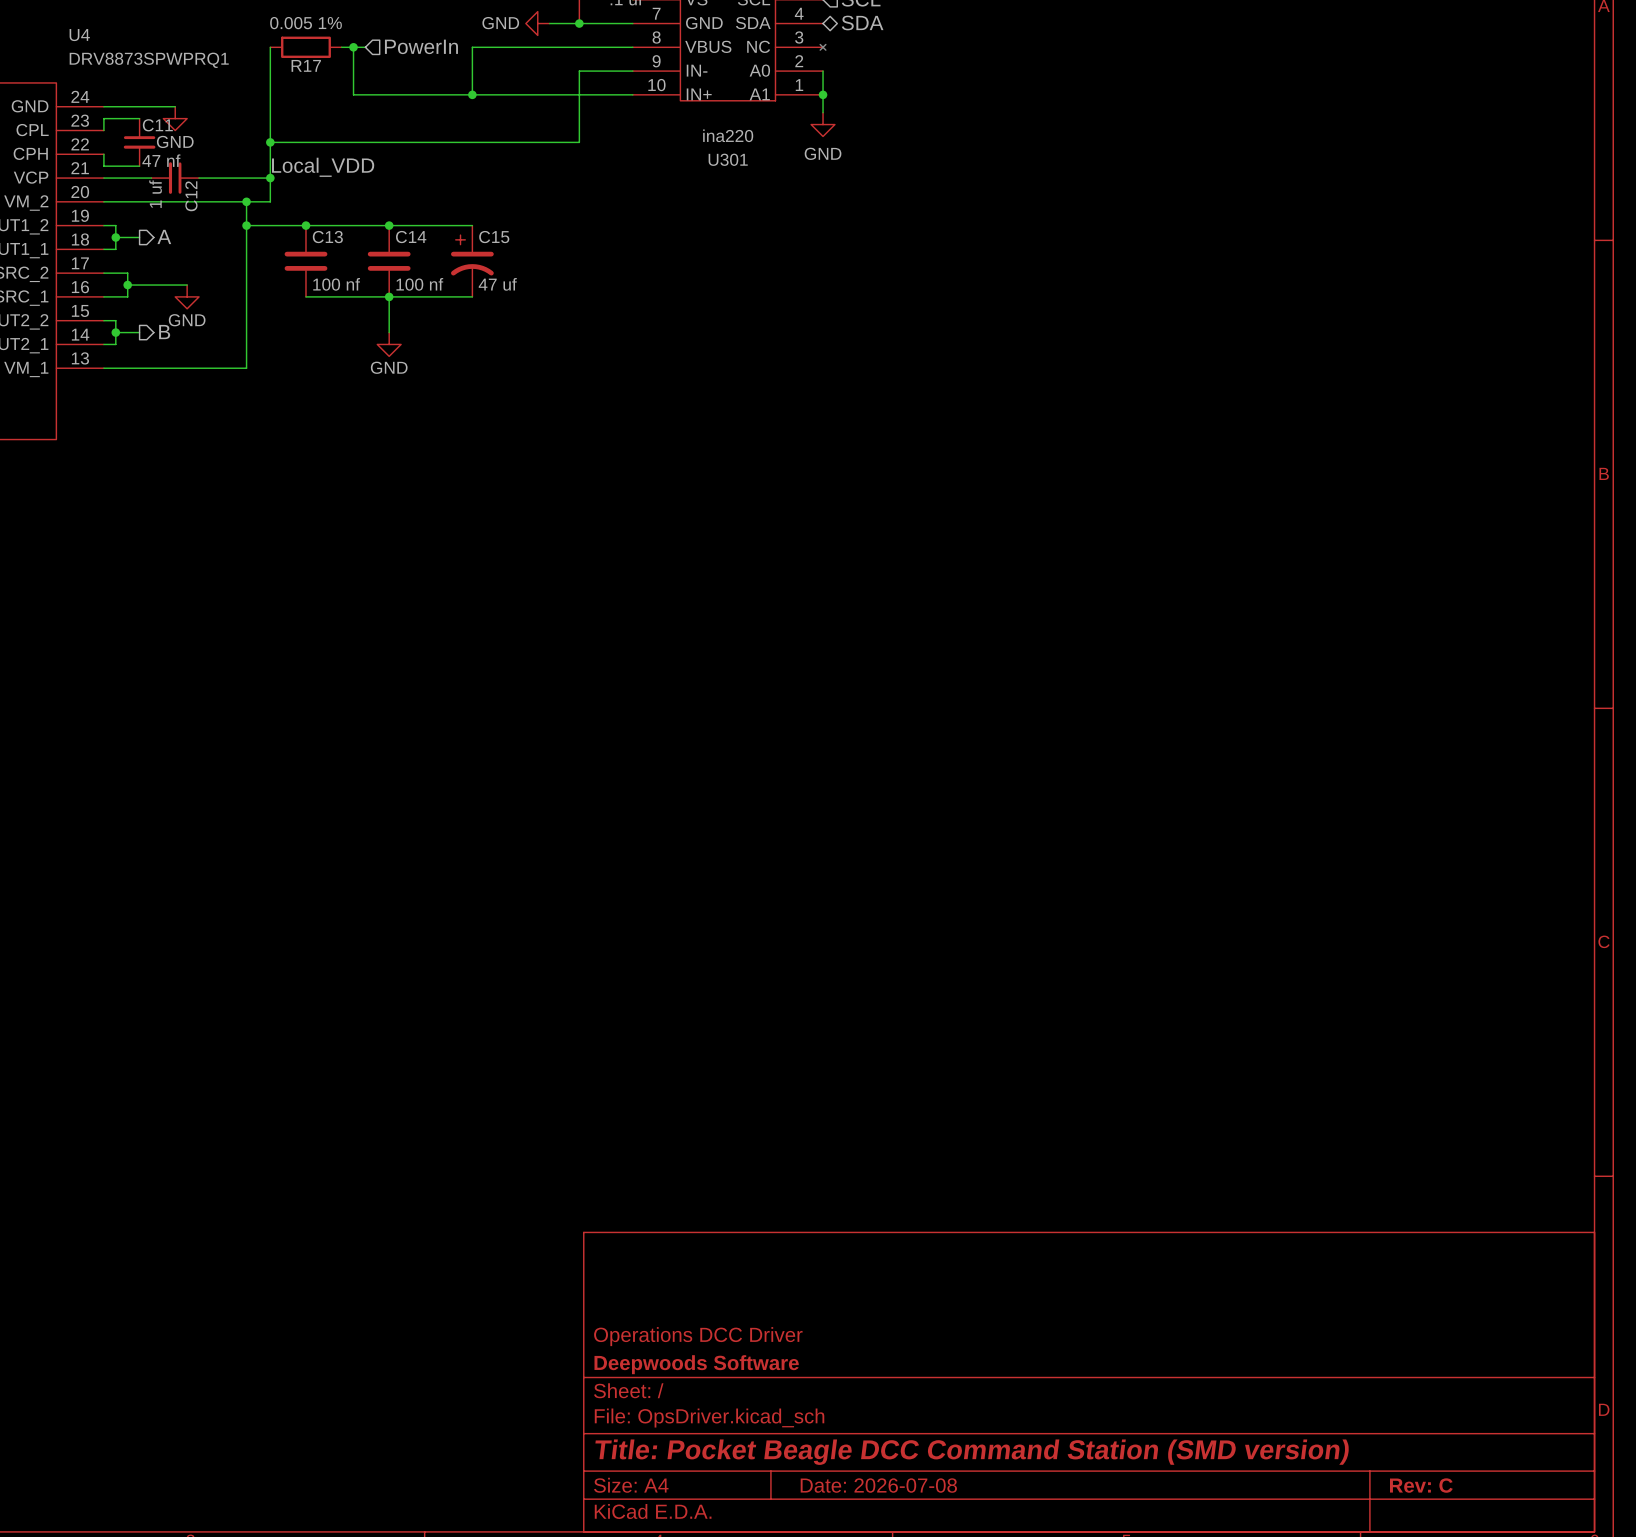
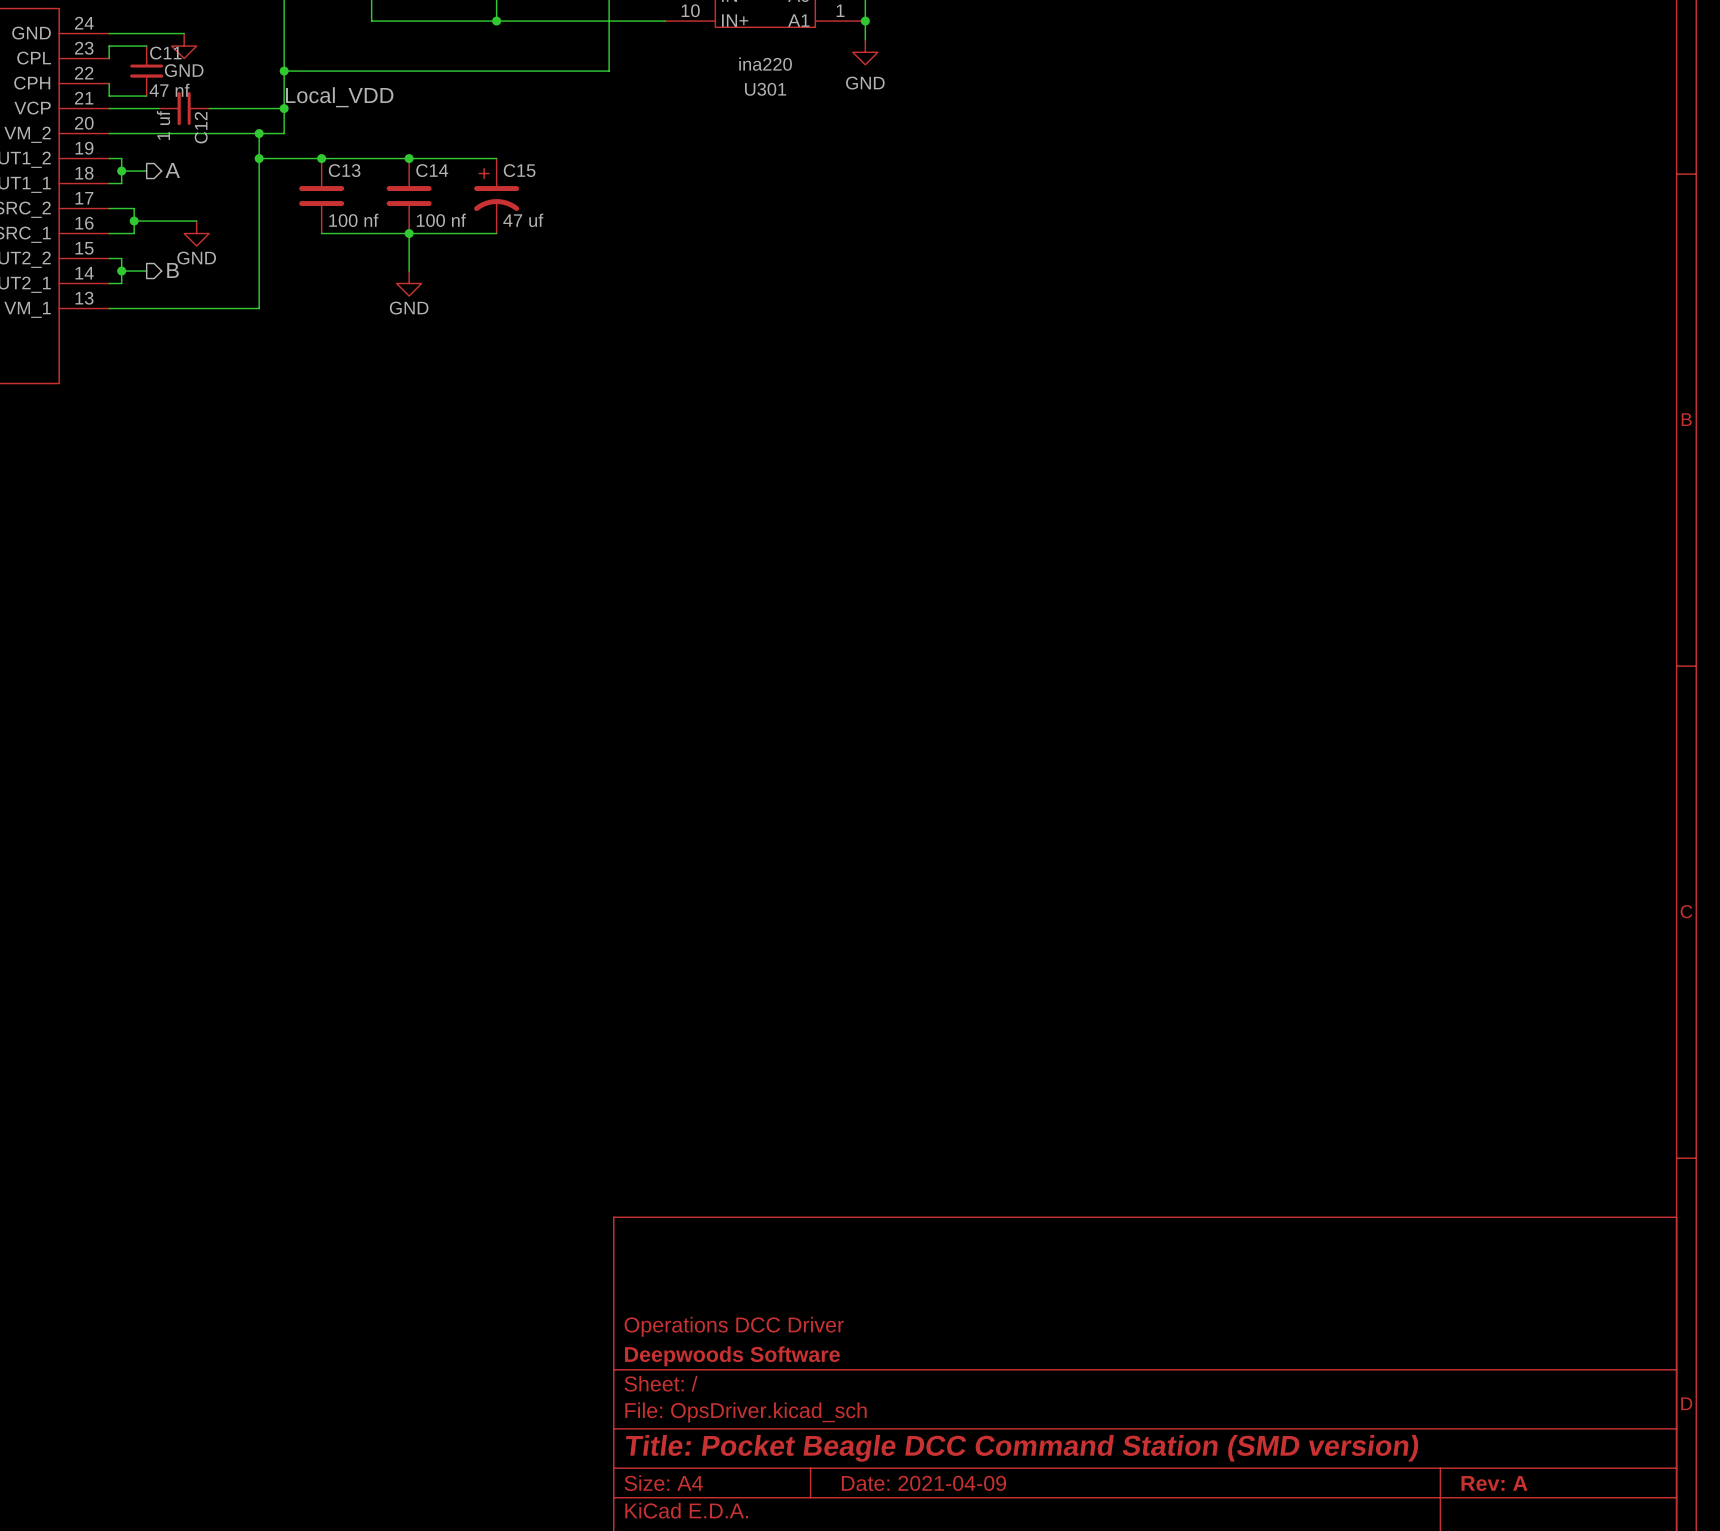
title block: Date: 2026-07-08 (878, 1485) -> Date: 2021-04-09 (923, 1483)
title block: Rev: C (1421, 1485) -> Rev: A (1494, 1483)

